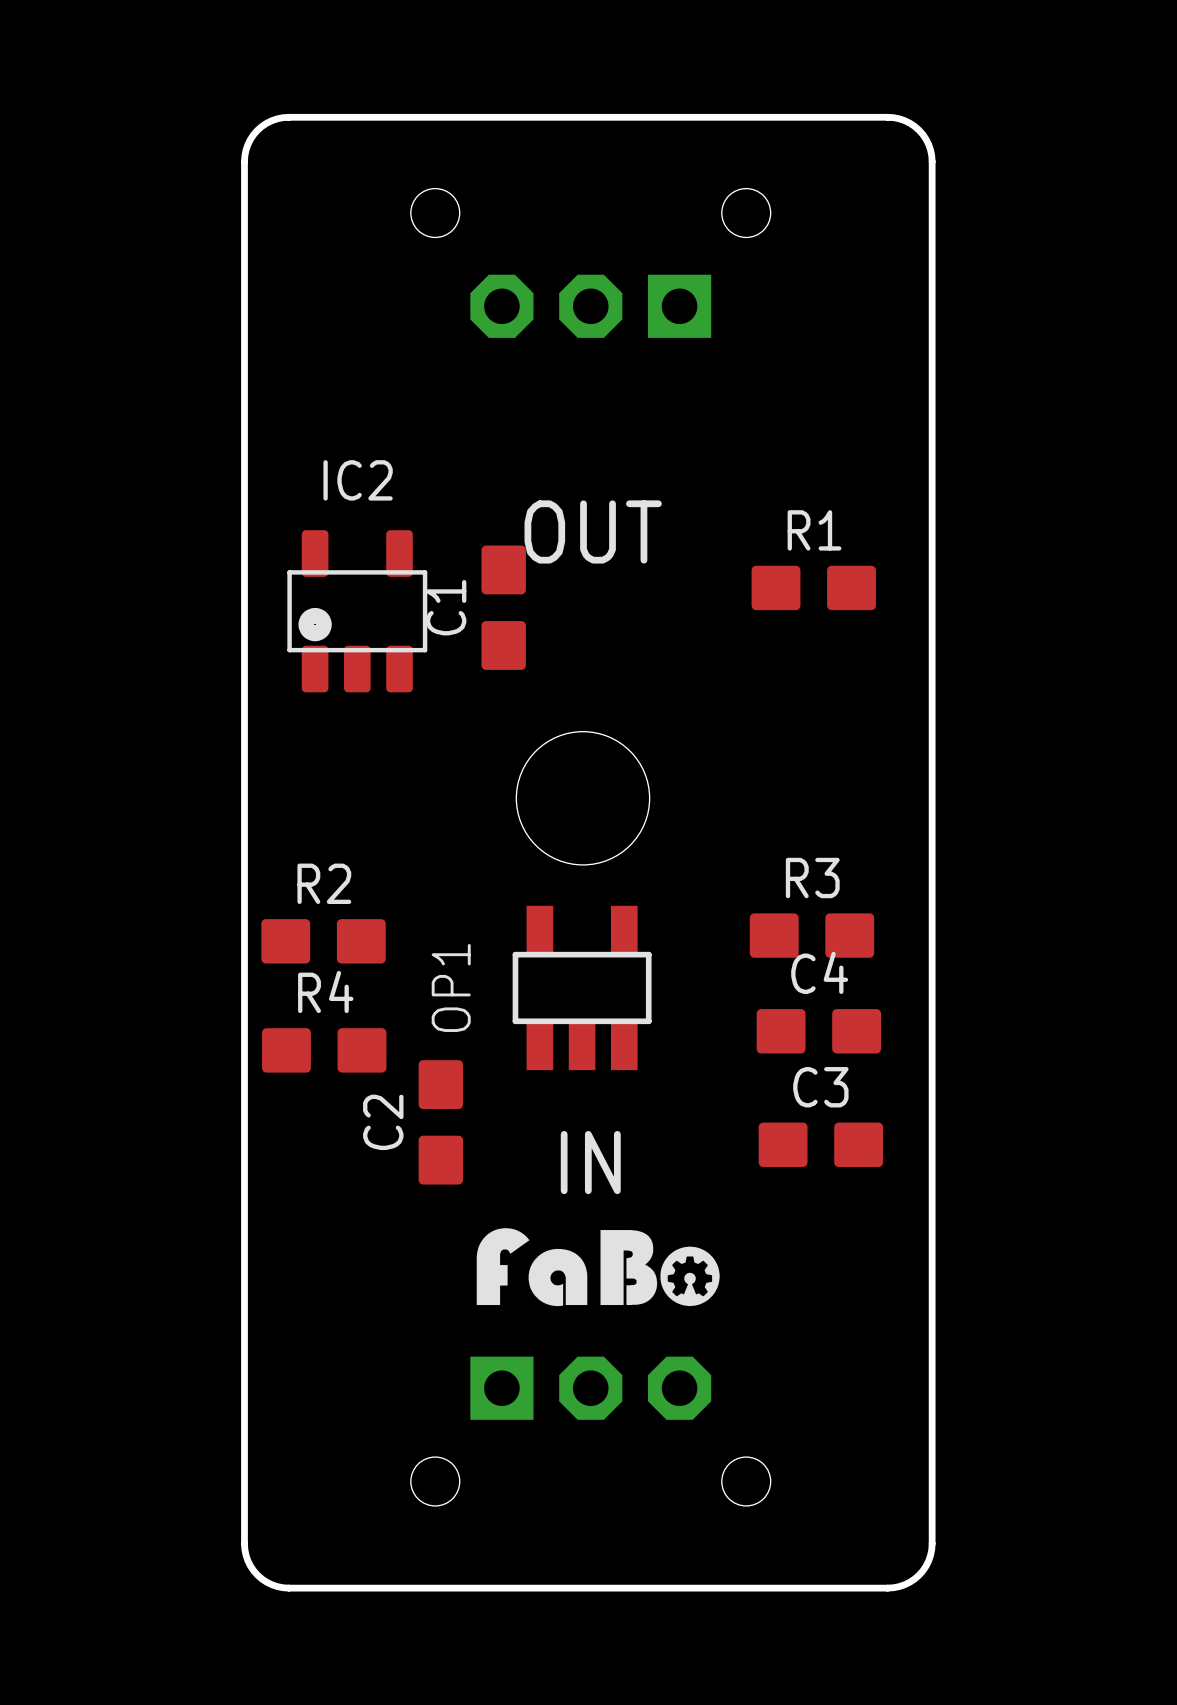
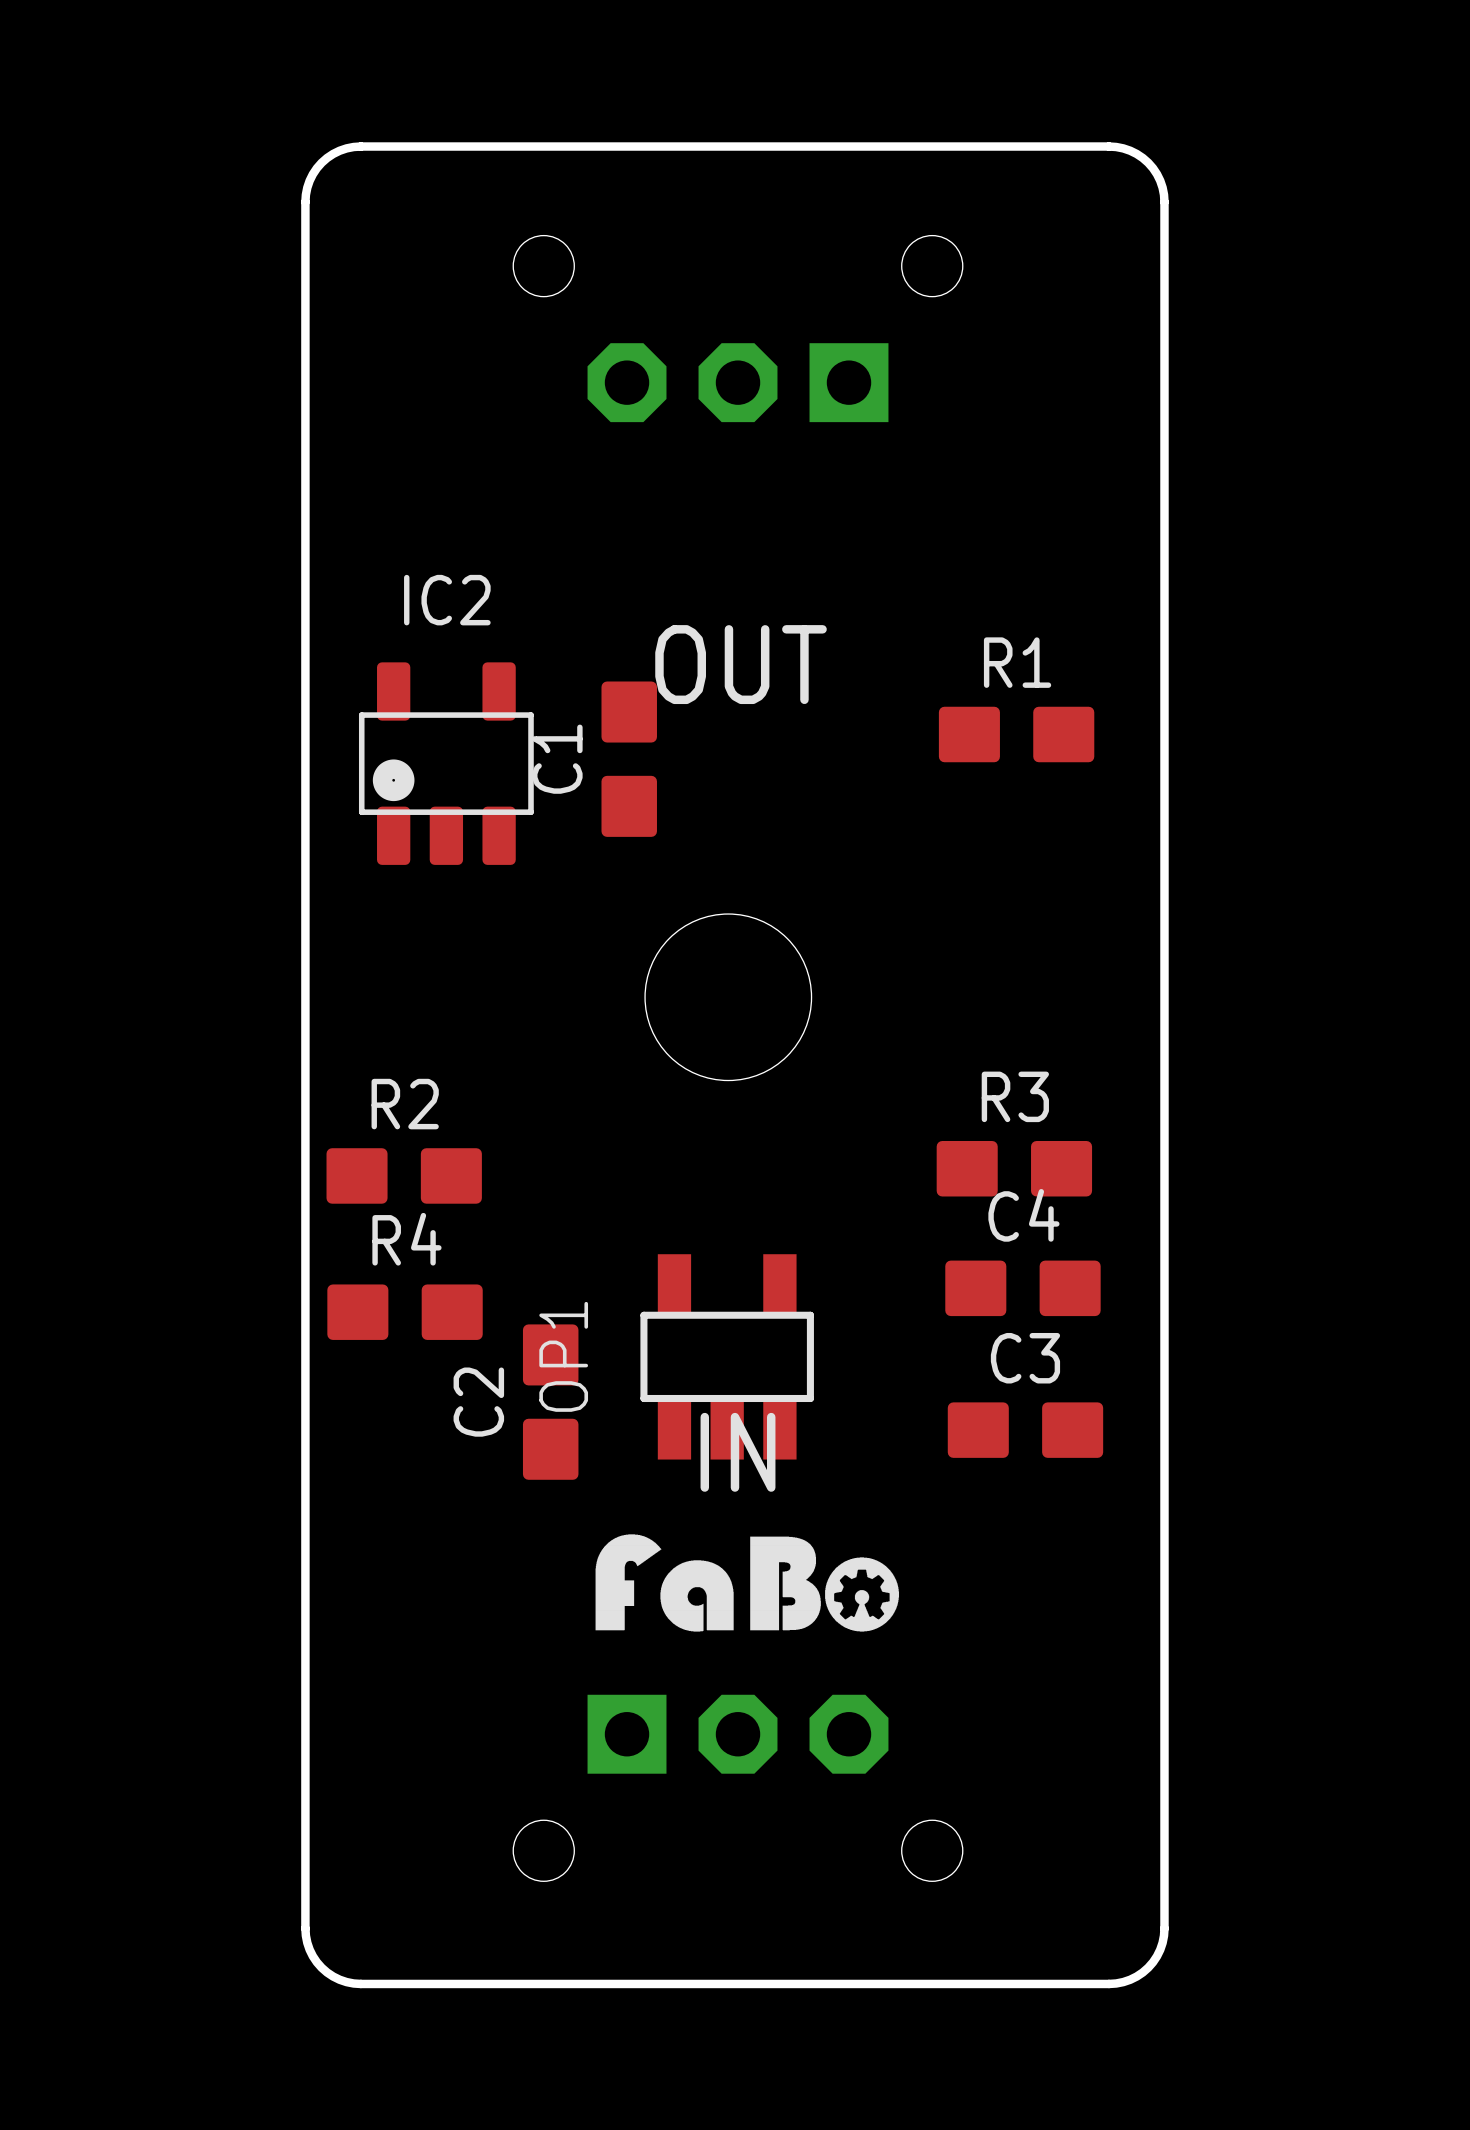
OP1 position: (582, 987) -> (727, 1356)

